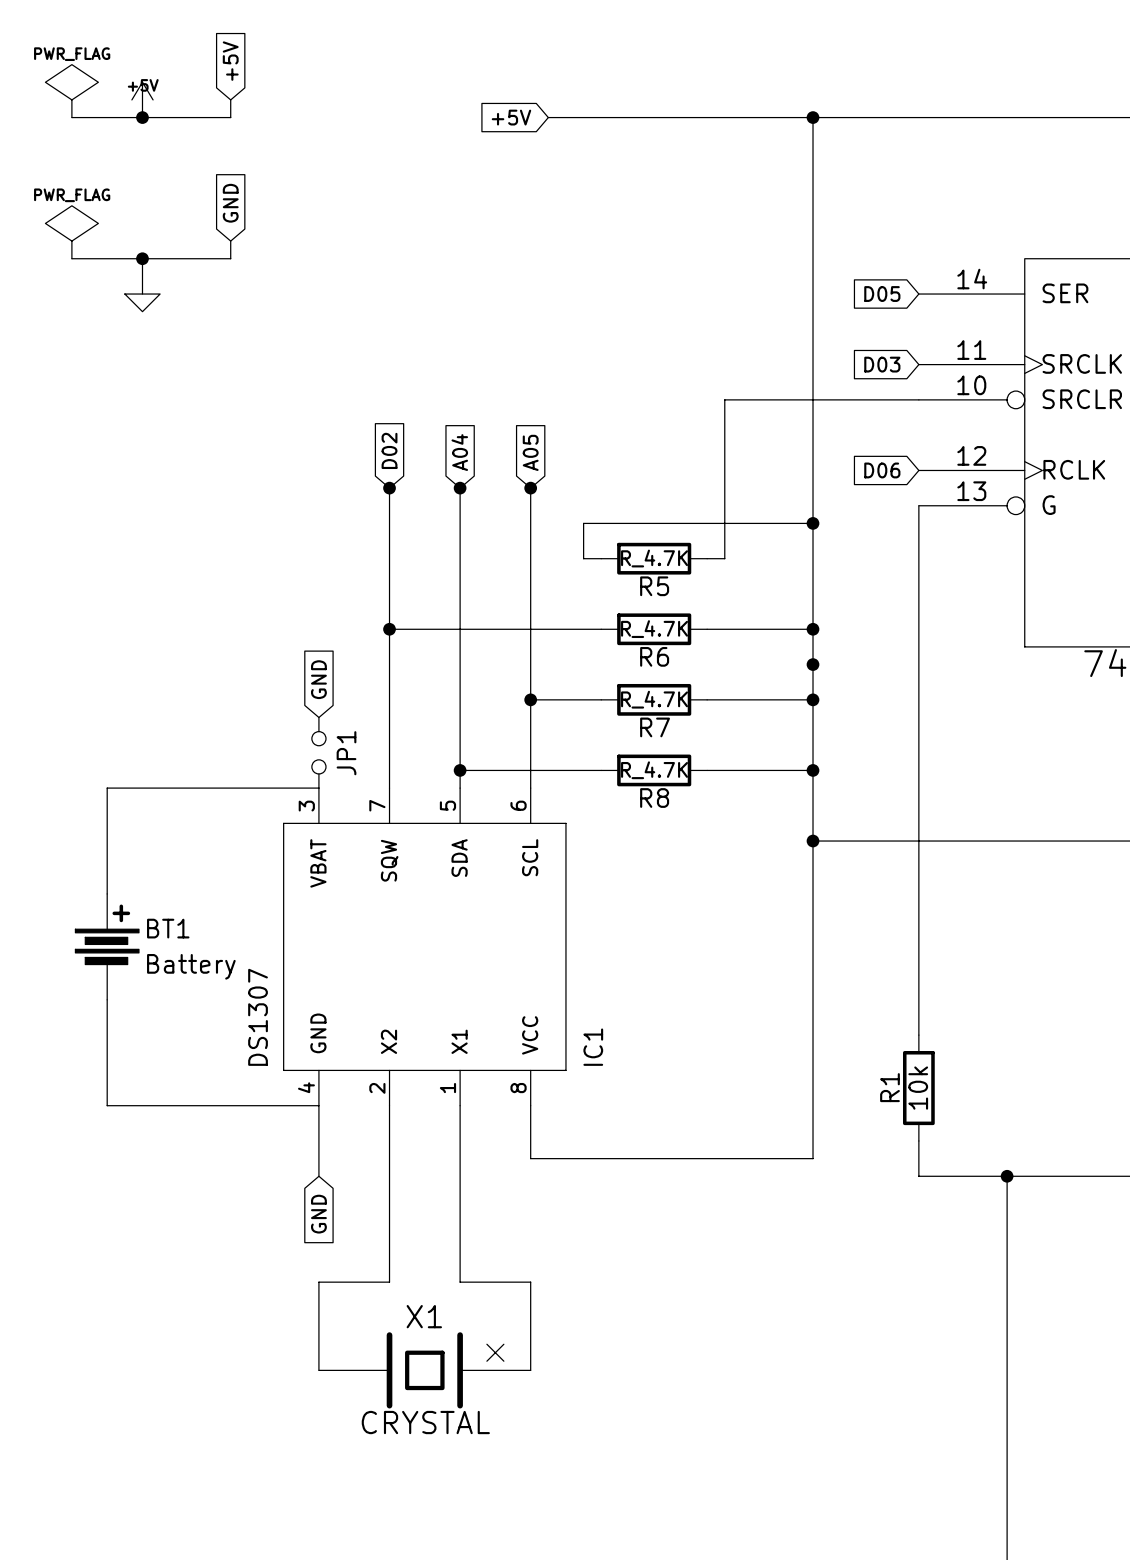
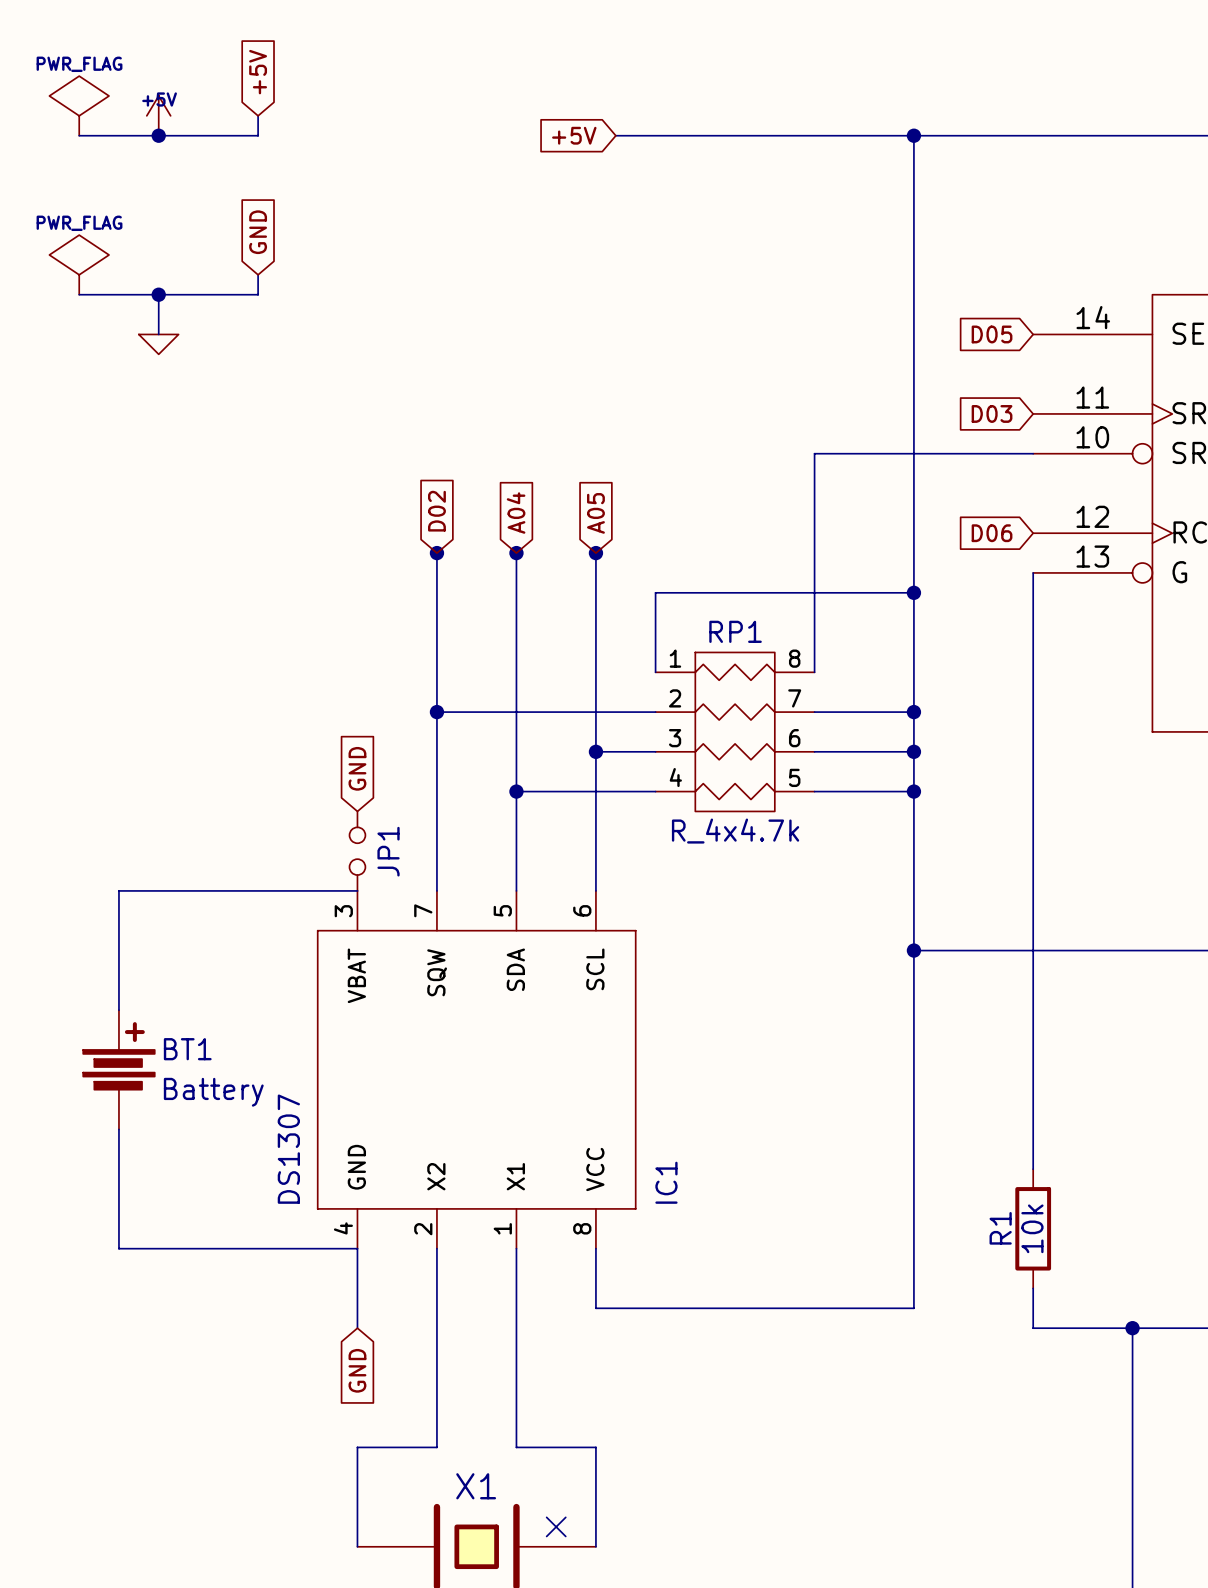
wire: (583, 558) (601, 558) -> (655, 632) (655, 672)
R5: R_4.7K (654, 558) -> none
wire: (707, 558) (724, 558) -> (814, 672) (814, 632)
R6: R_4.7K (654, 629) -> none
RP1: none -> R_4x4.7k (735, 731)
wire: none -> (595, 751) (655, 751)
junction: none -> (595, 751)
wire: none -> (814, 751) (913, 751)
wire: none -> (516, 791) (595, 791)
junction: none -> (516, 791)
junction: (530, 699) -> none
R7: R_4.7K (654, 699) -> none
wire: (460, 770) (601, 770) -> none
junction: (460, 770) -> none
R8: R_4.7K (654, 770) -> none
wire: (707, 770) (813, 770) -> none
junction: (813, 770) -> none

